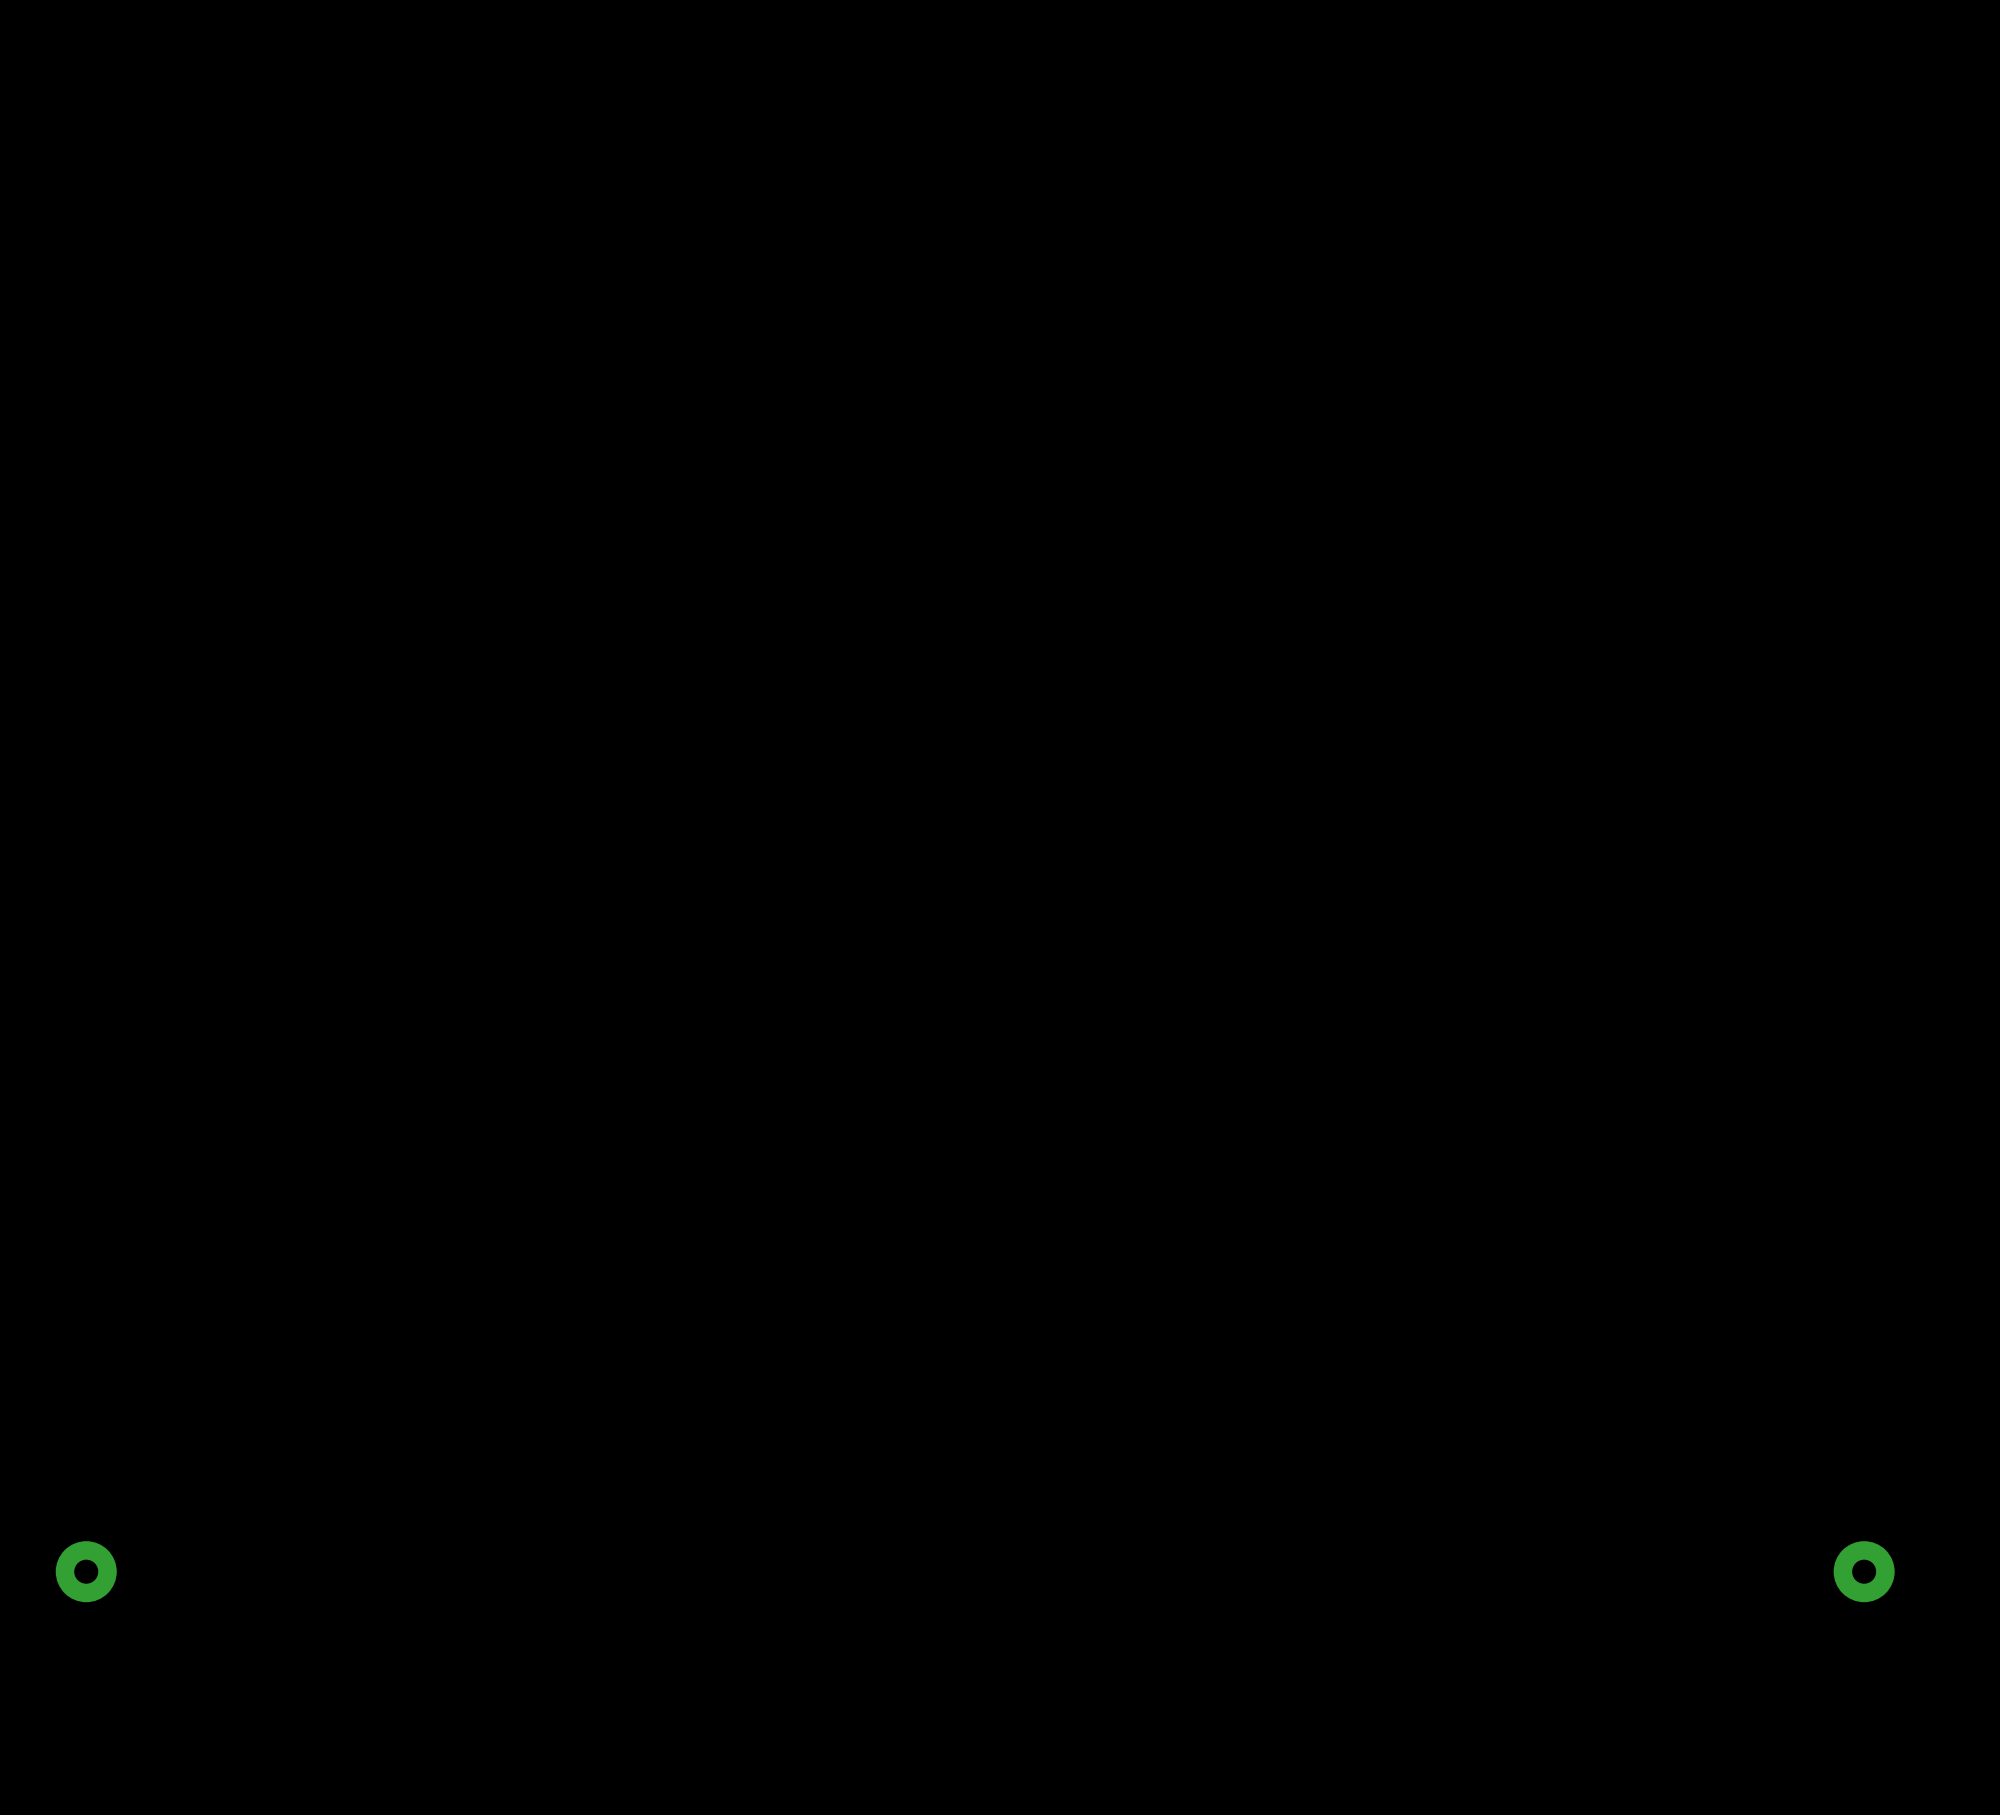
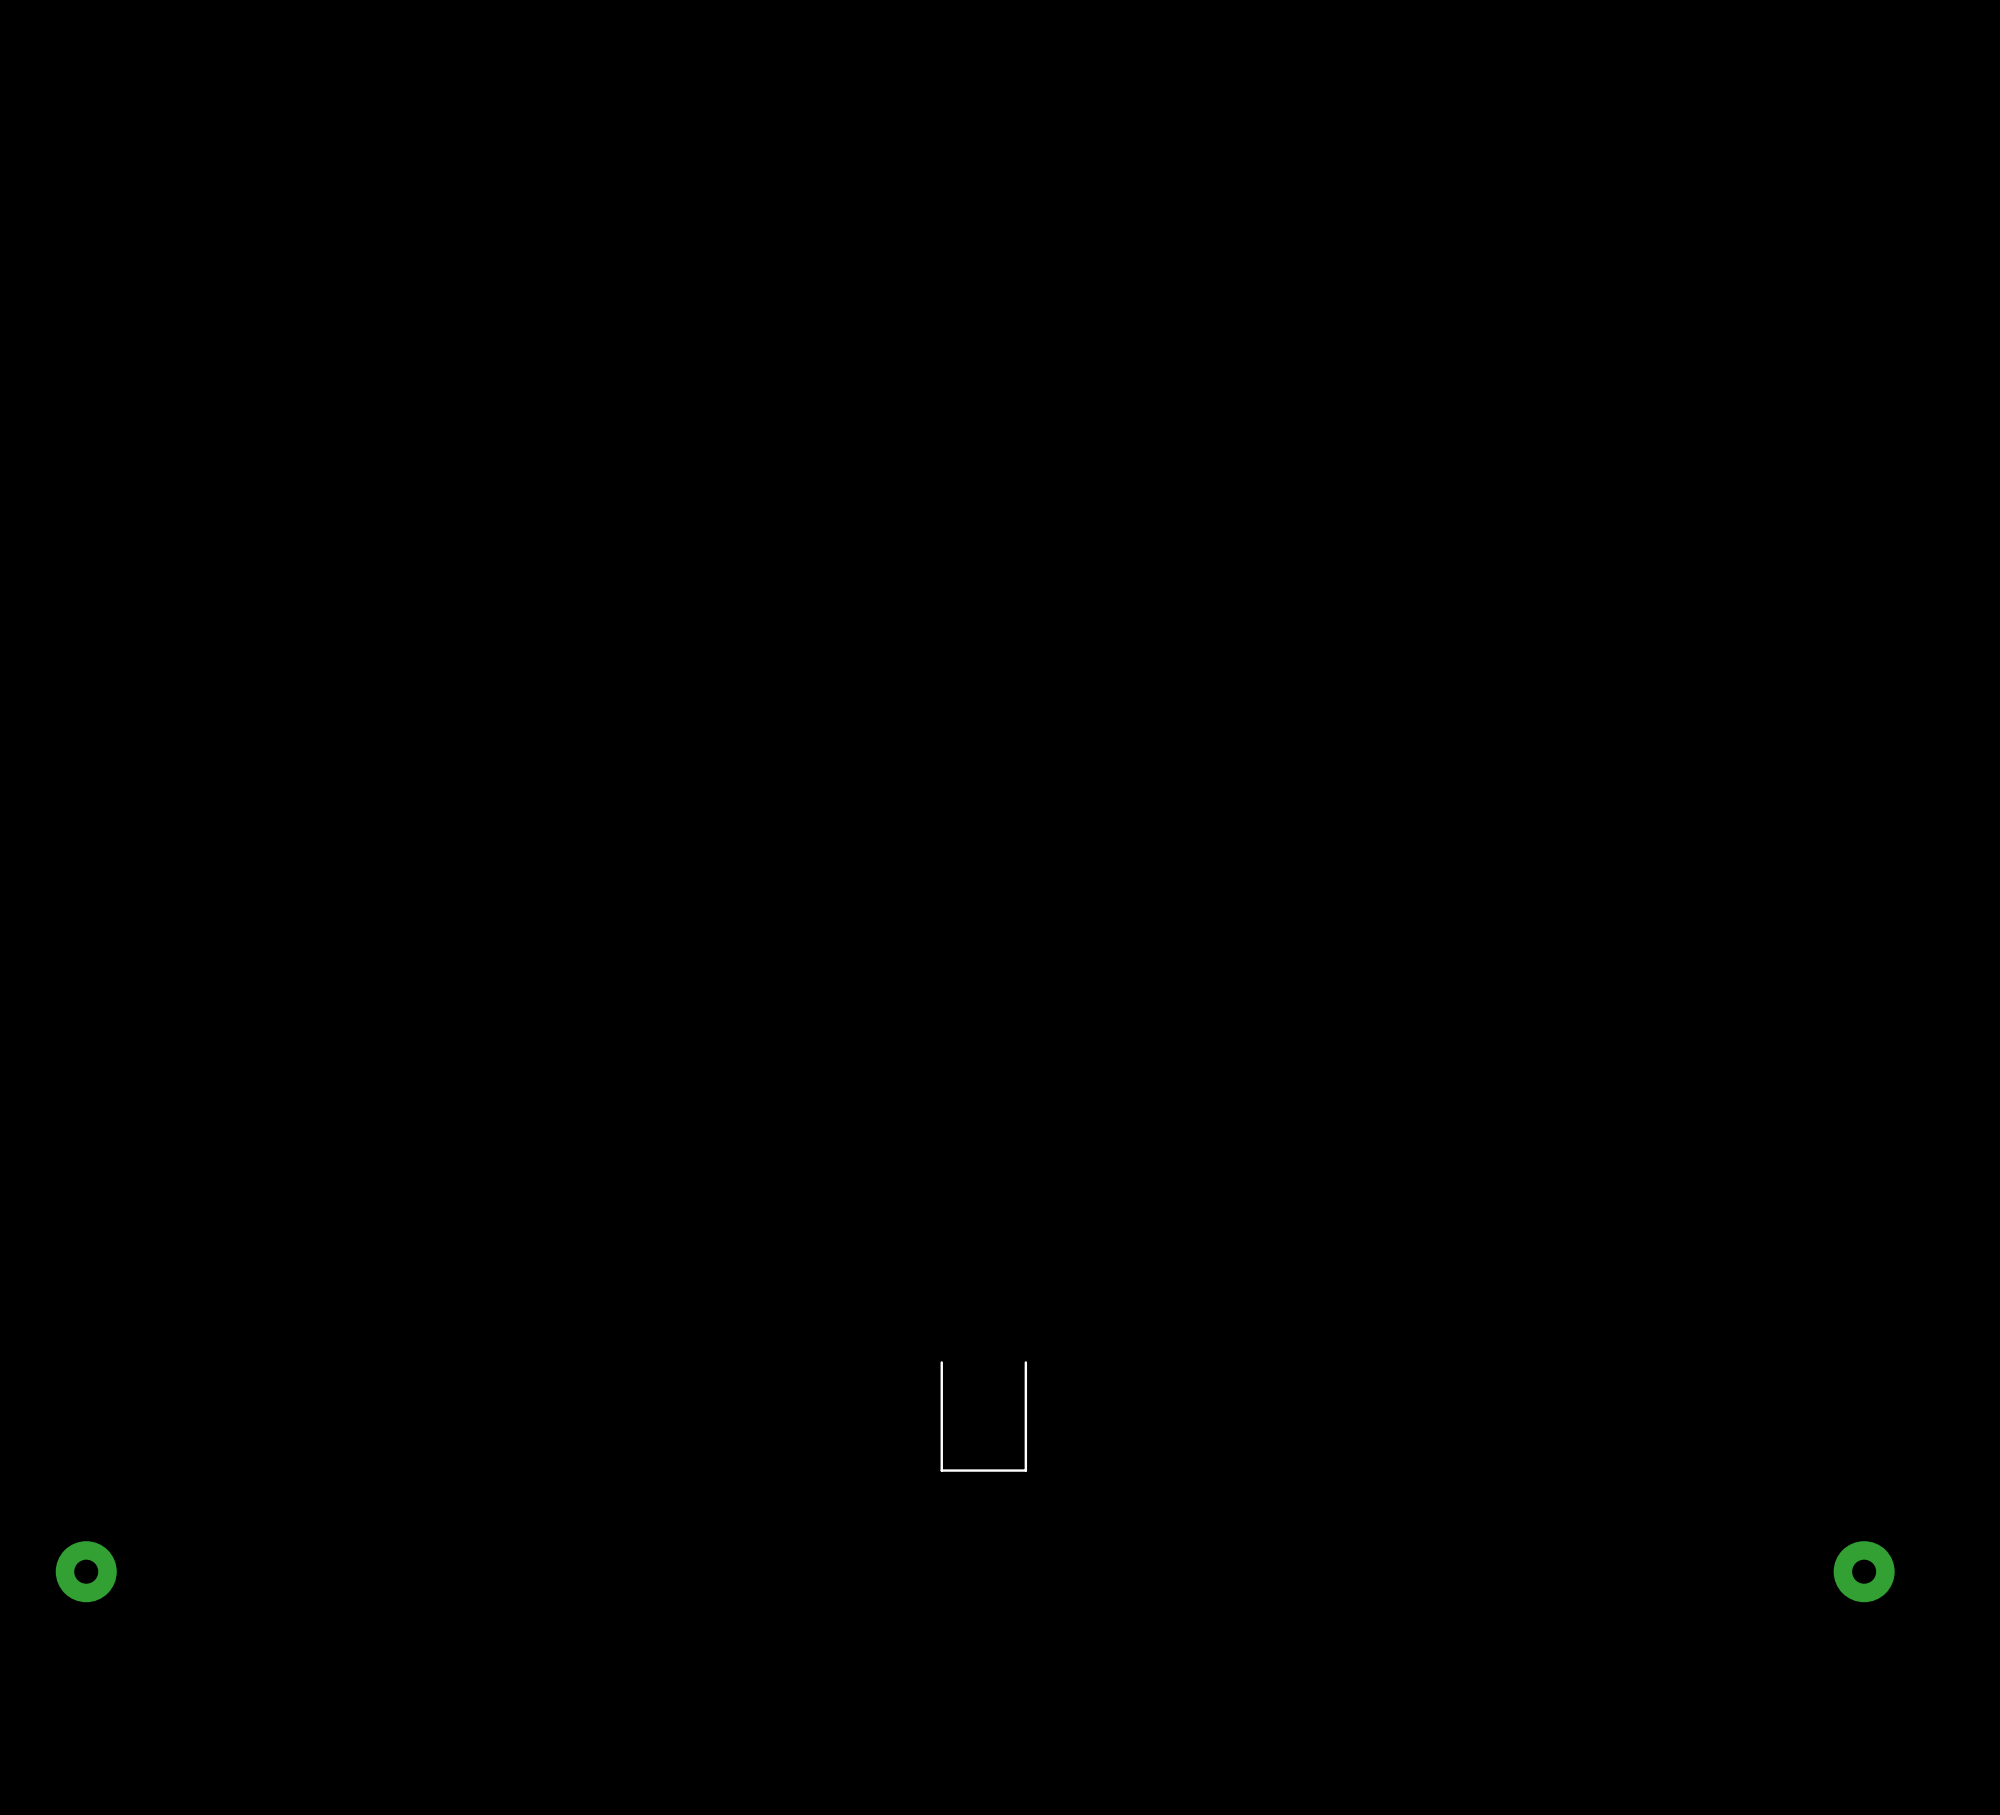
part: none -> (983, 1416)

